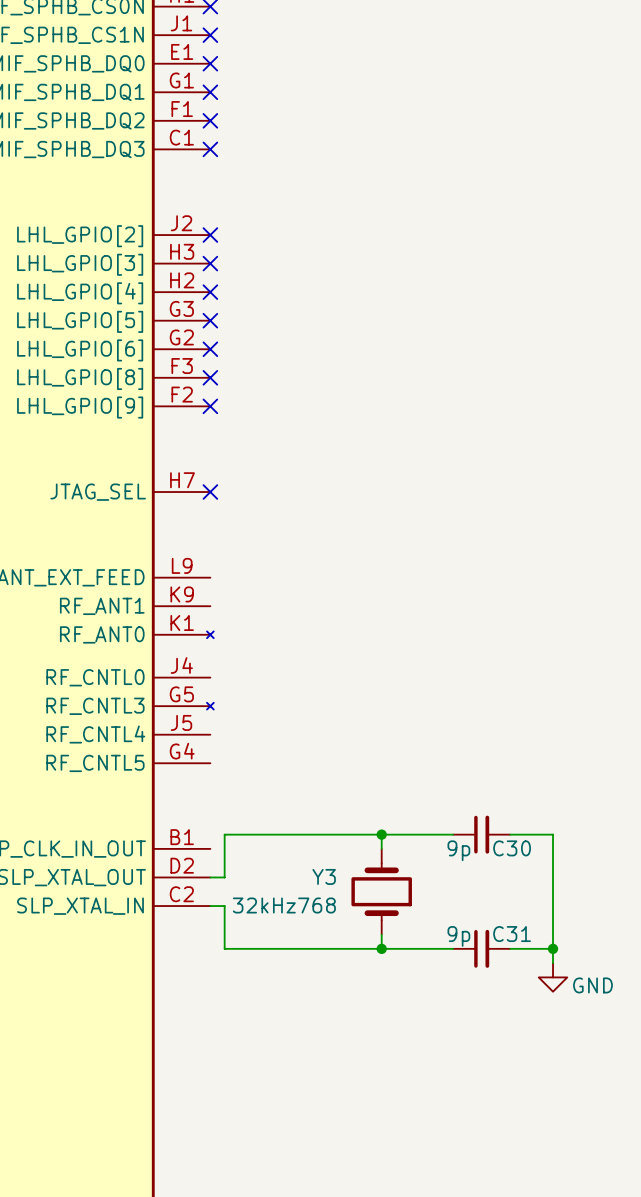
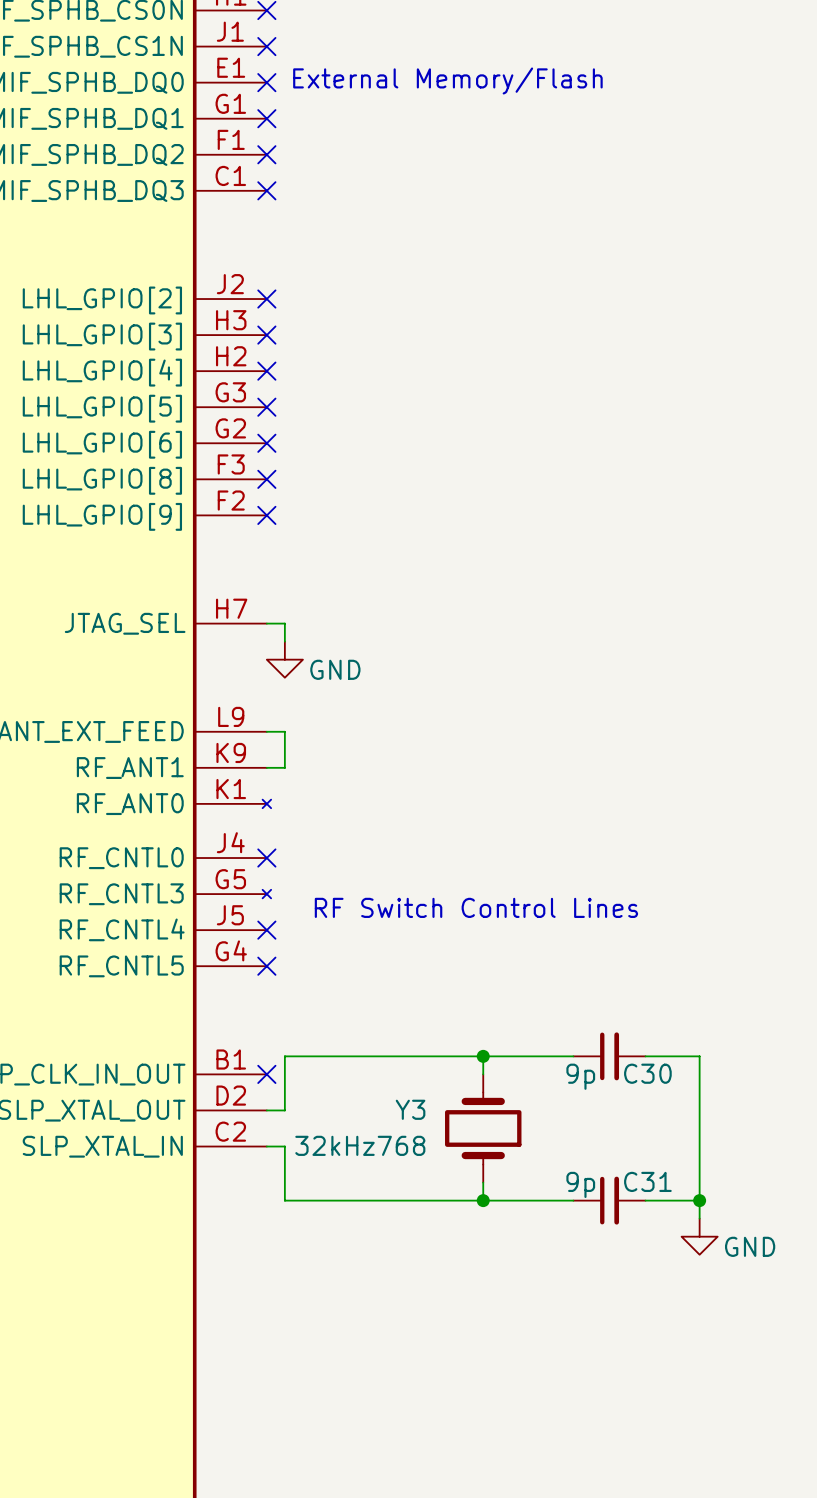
text: none -> External Memory/Flash (447, 80)
wire: none -> (266, 623) (284, 623) (284, 641)
no-connect mark: (210, 492) -> none
power symbol: none -> GND (284, 659)
wire: none -> (266, 731) (284, 731) (284, 767) (266, 767)
no-connect mark: none -> (266, 858)
text: none -> RF Switch Control Lines (476, 907)
no-connect mark: none -> (266, 930)
no-connect mark: none -> (266, 966)
no-connect mark: none -> (266, 1074)

